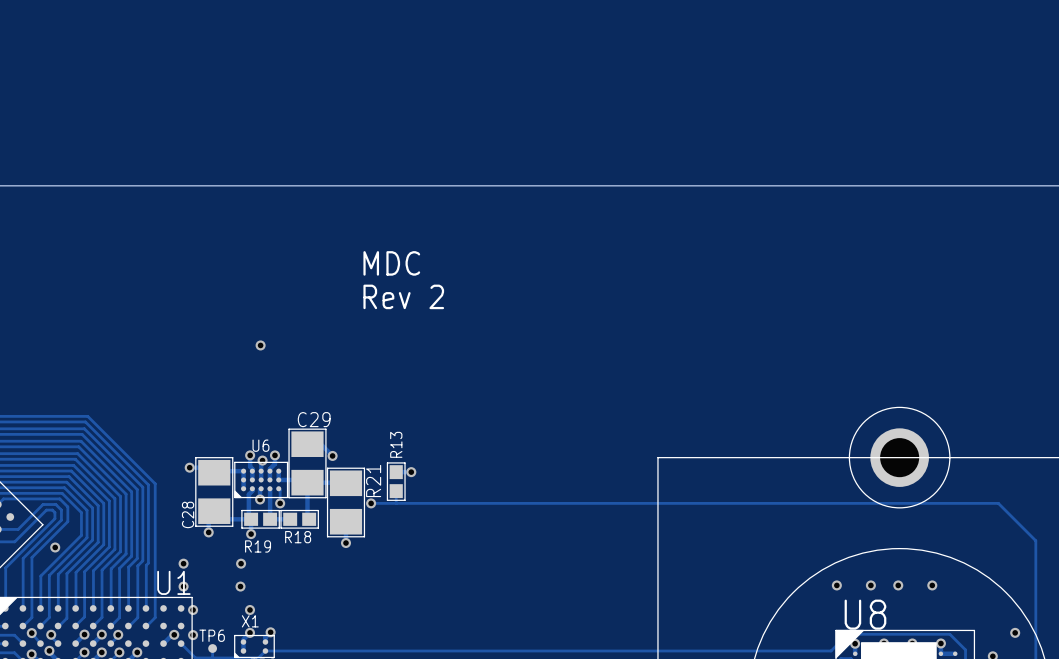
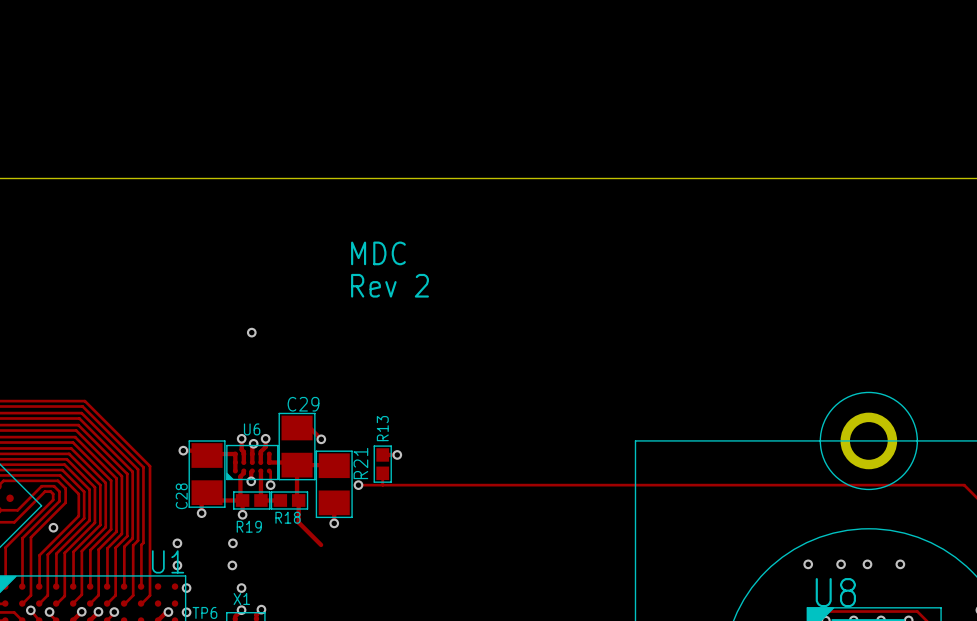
track: none -> (298, 500) (298, 522) (321, 544)

